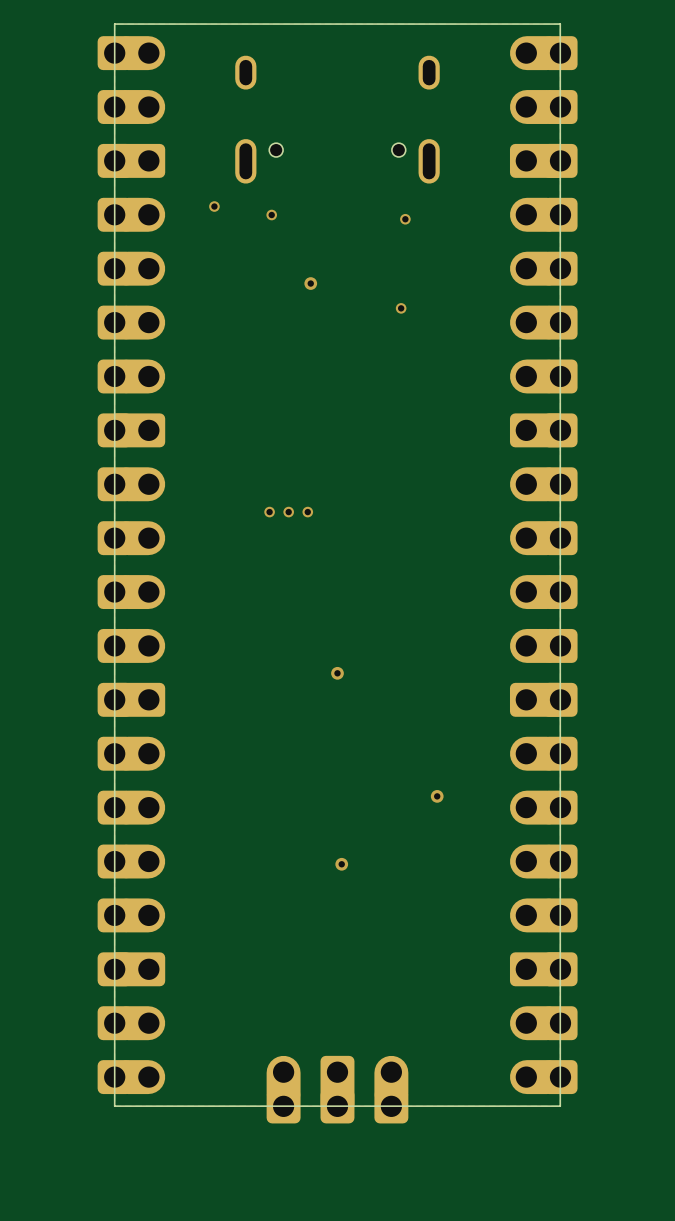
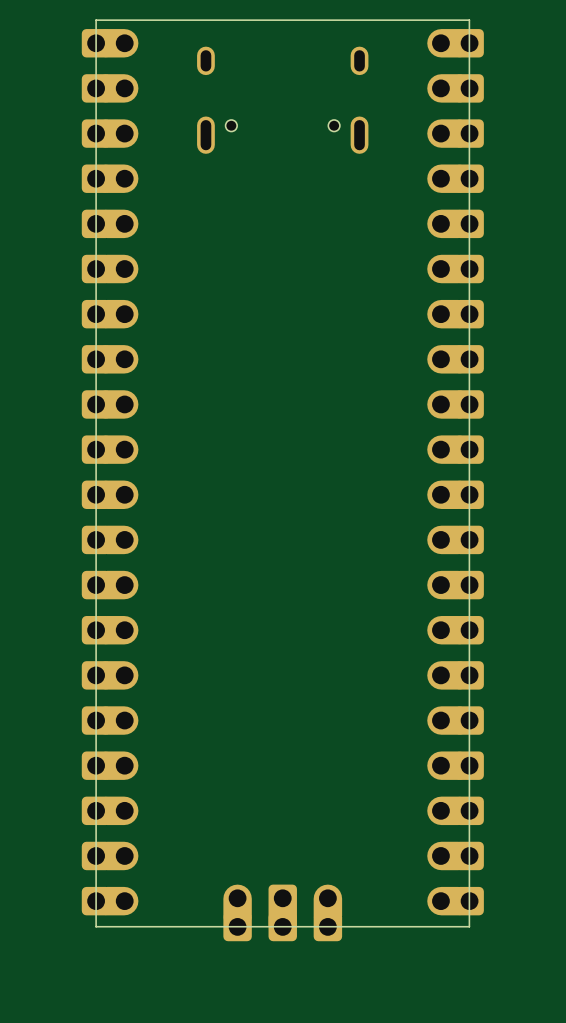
part footprint: [97, 36, 166, 1095] -> [81, 29, 139, 916]
part footprint: [509, 36, 578, 1095] -> [427, 29, 484, 916]
via: (214, 206) -> none
via: (271, 215) -> none
via: (405, 219) -> none
via: (310, 283) -> none
via: (401, 308) -> none
via: (269, 512) -> none
via: (288, 512) -> none
via: (307, 512) -> none
via: (337, 673) -> none
via: (437, 796) -> none
via: (341, 864) -> none

